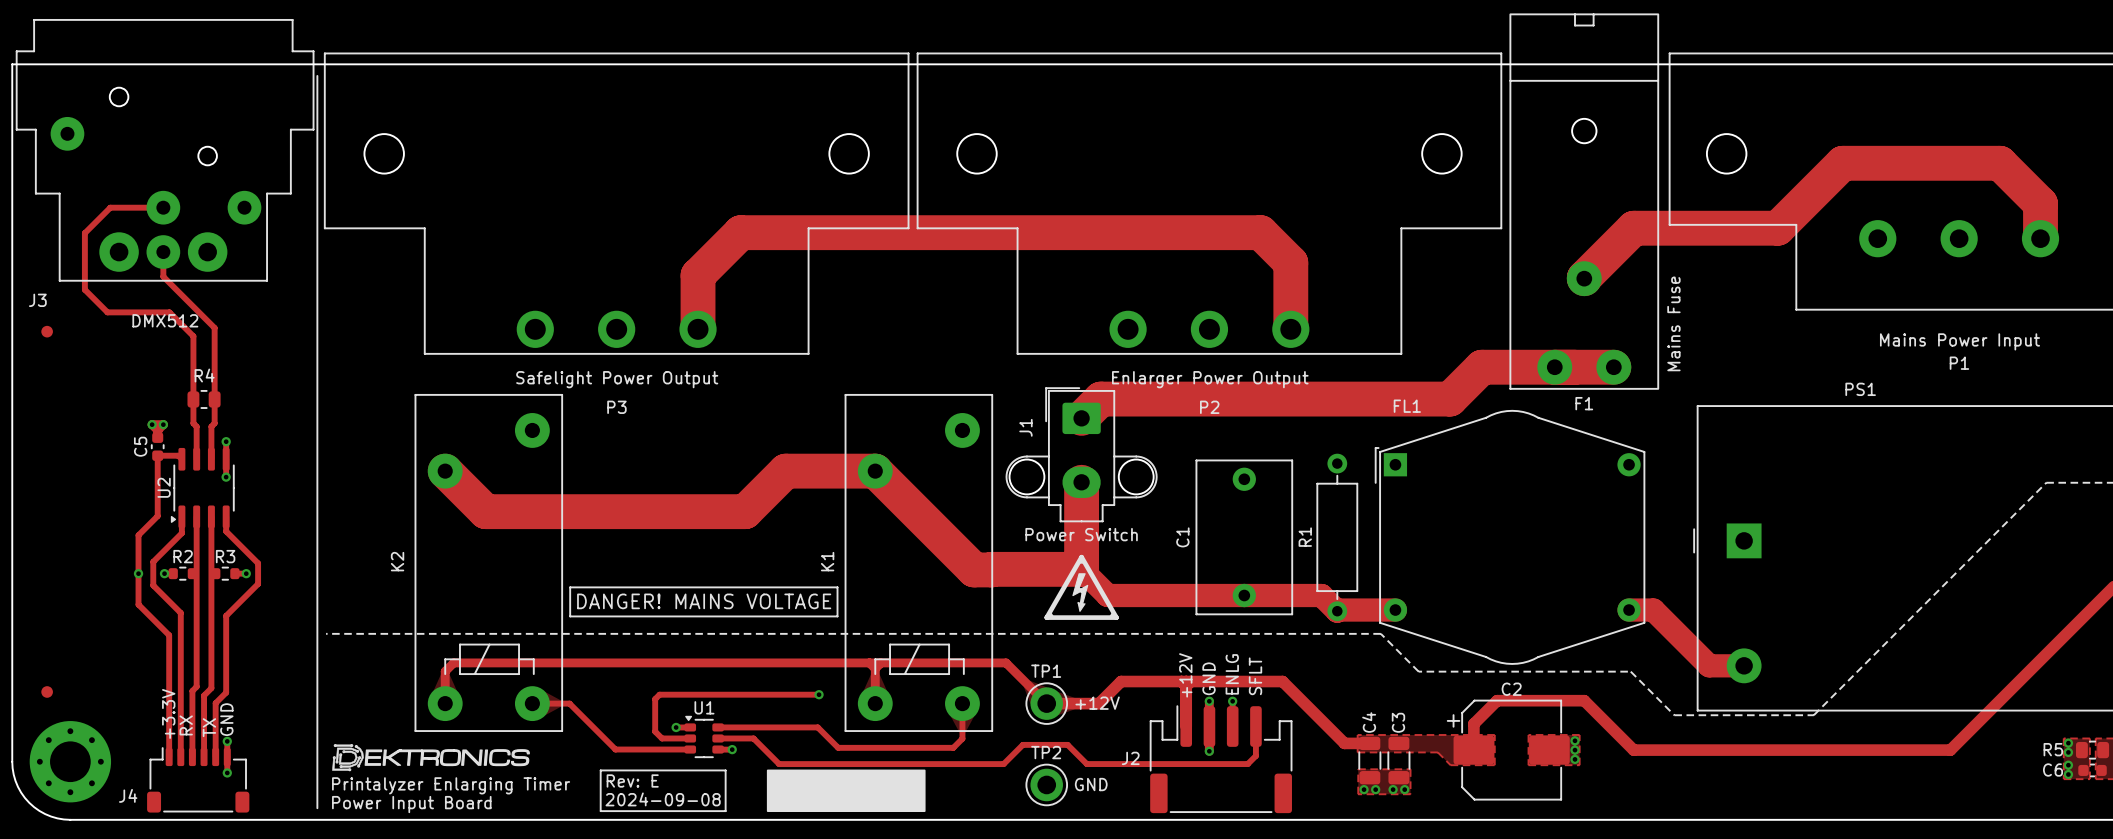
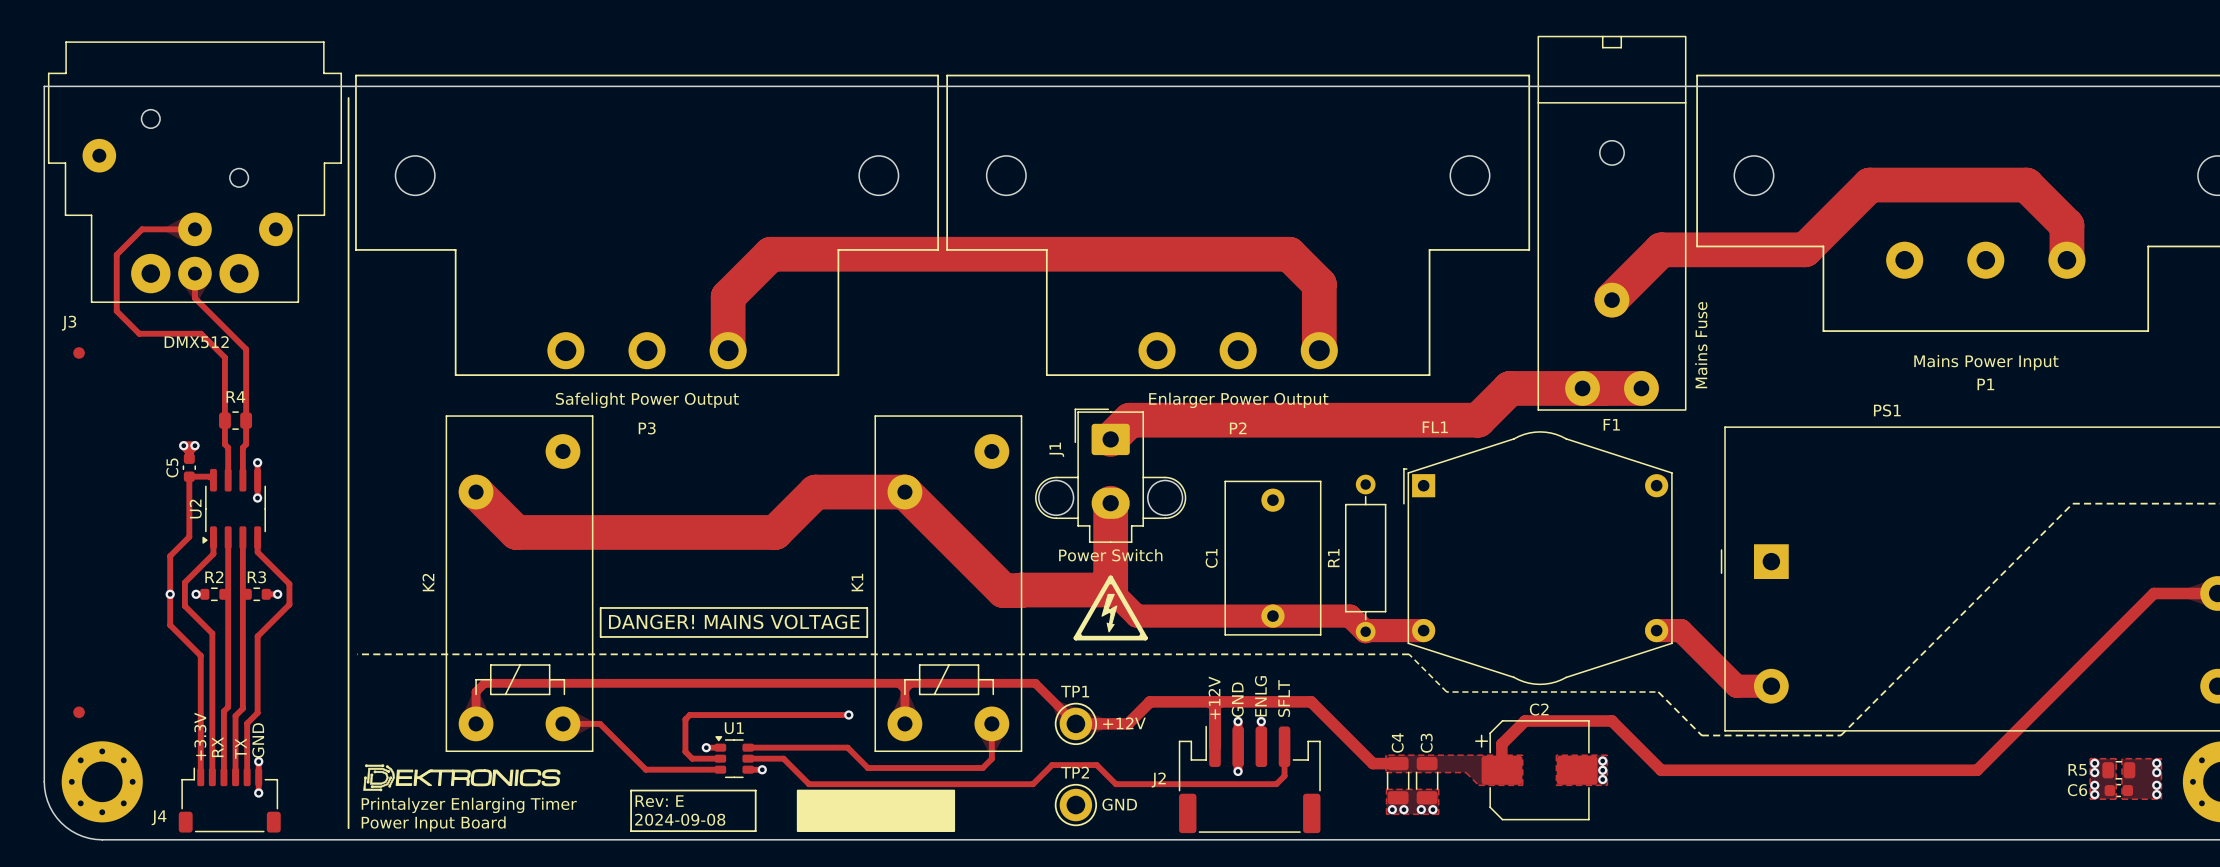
J3 footprint: [15, 19, 315, 282] -> [47, 41, 342, 303]

